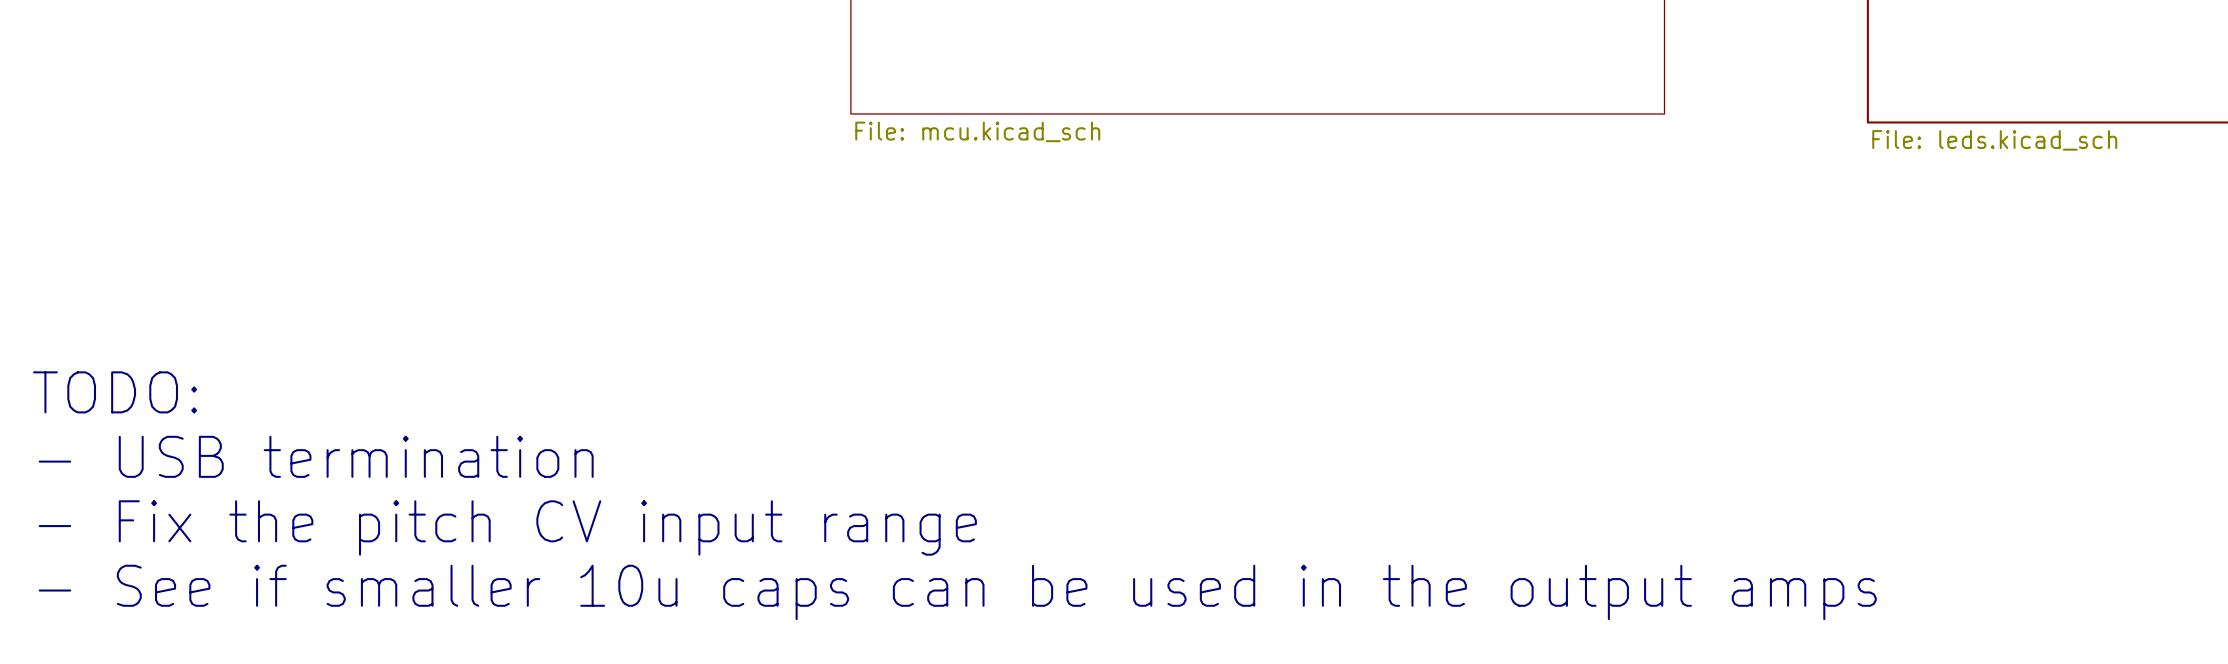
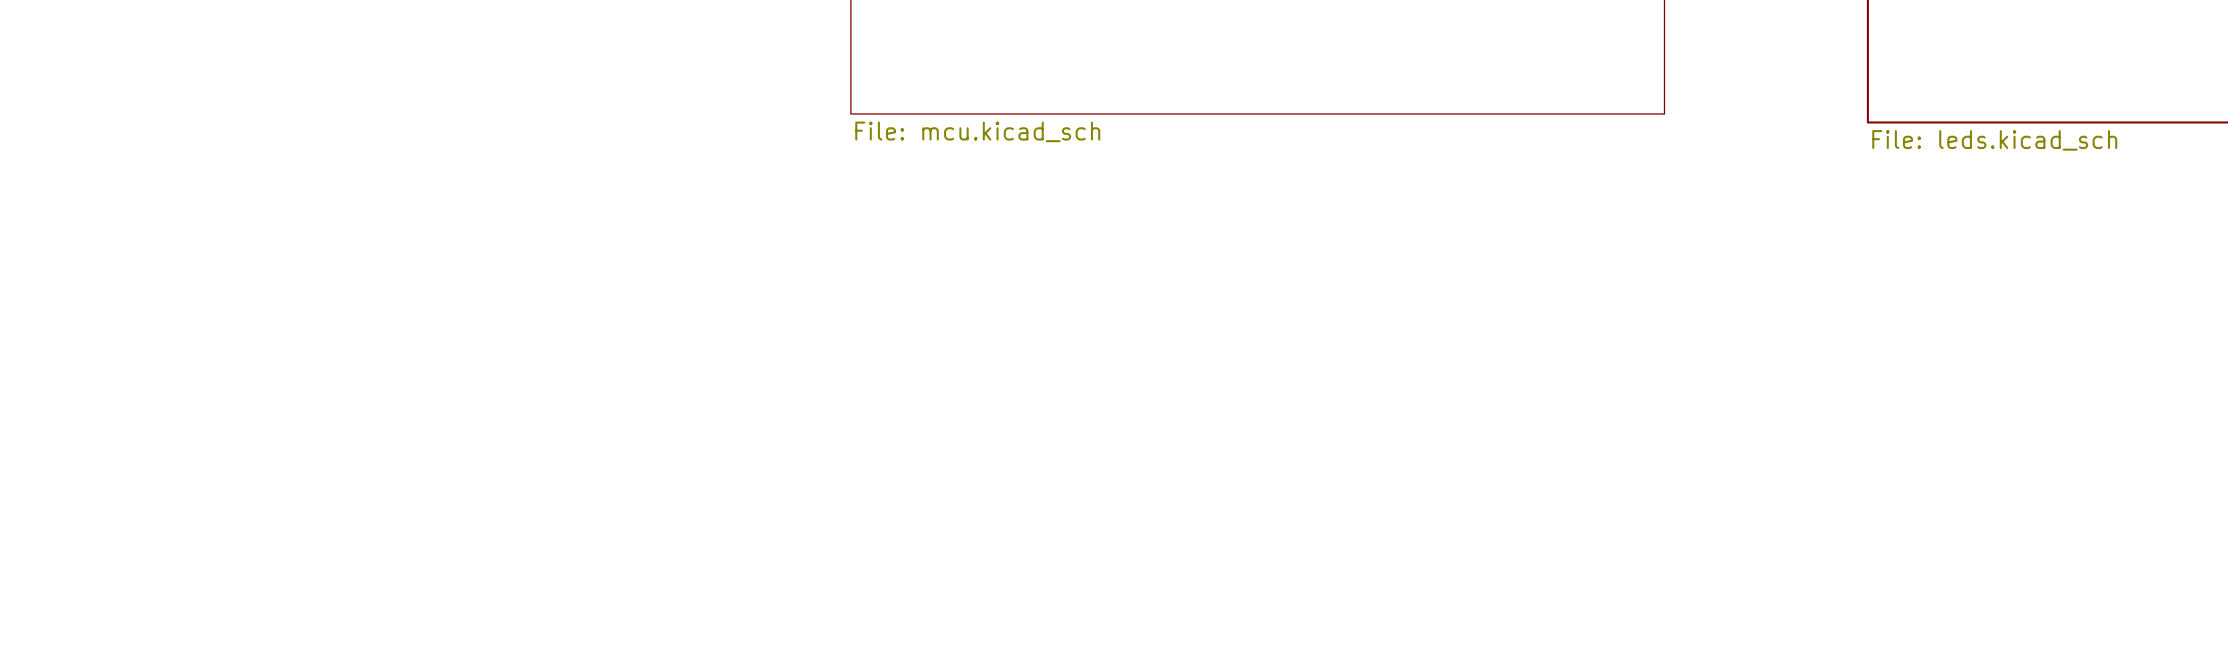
text: TODO: (115, 392) -> none
text: - USB termination (316, 456) -> none
text: - Fix the pitch CV input range (507, 527) -> none
text: - See if smaller 10u caps can be used in the output amps (957, 592) -> none

